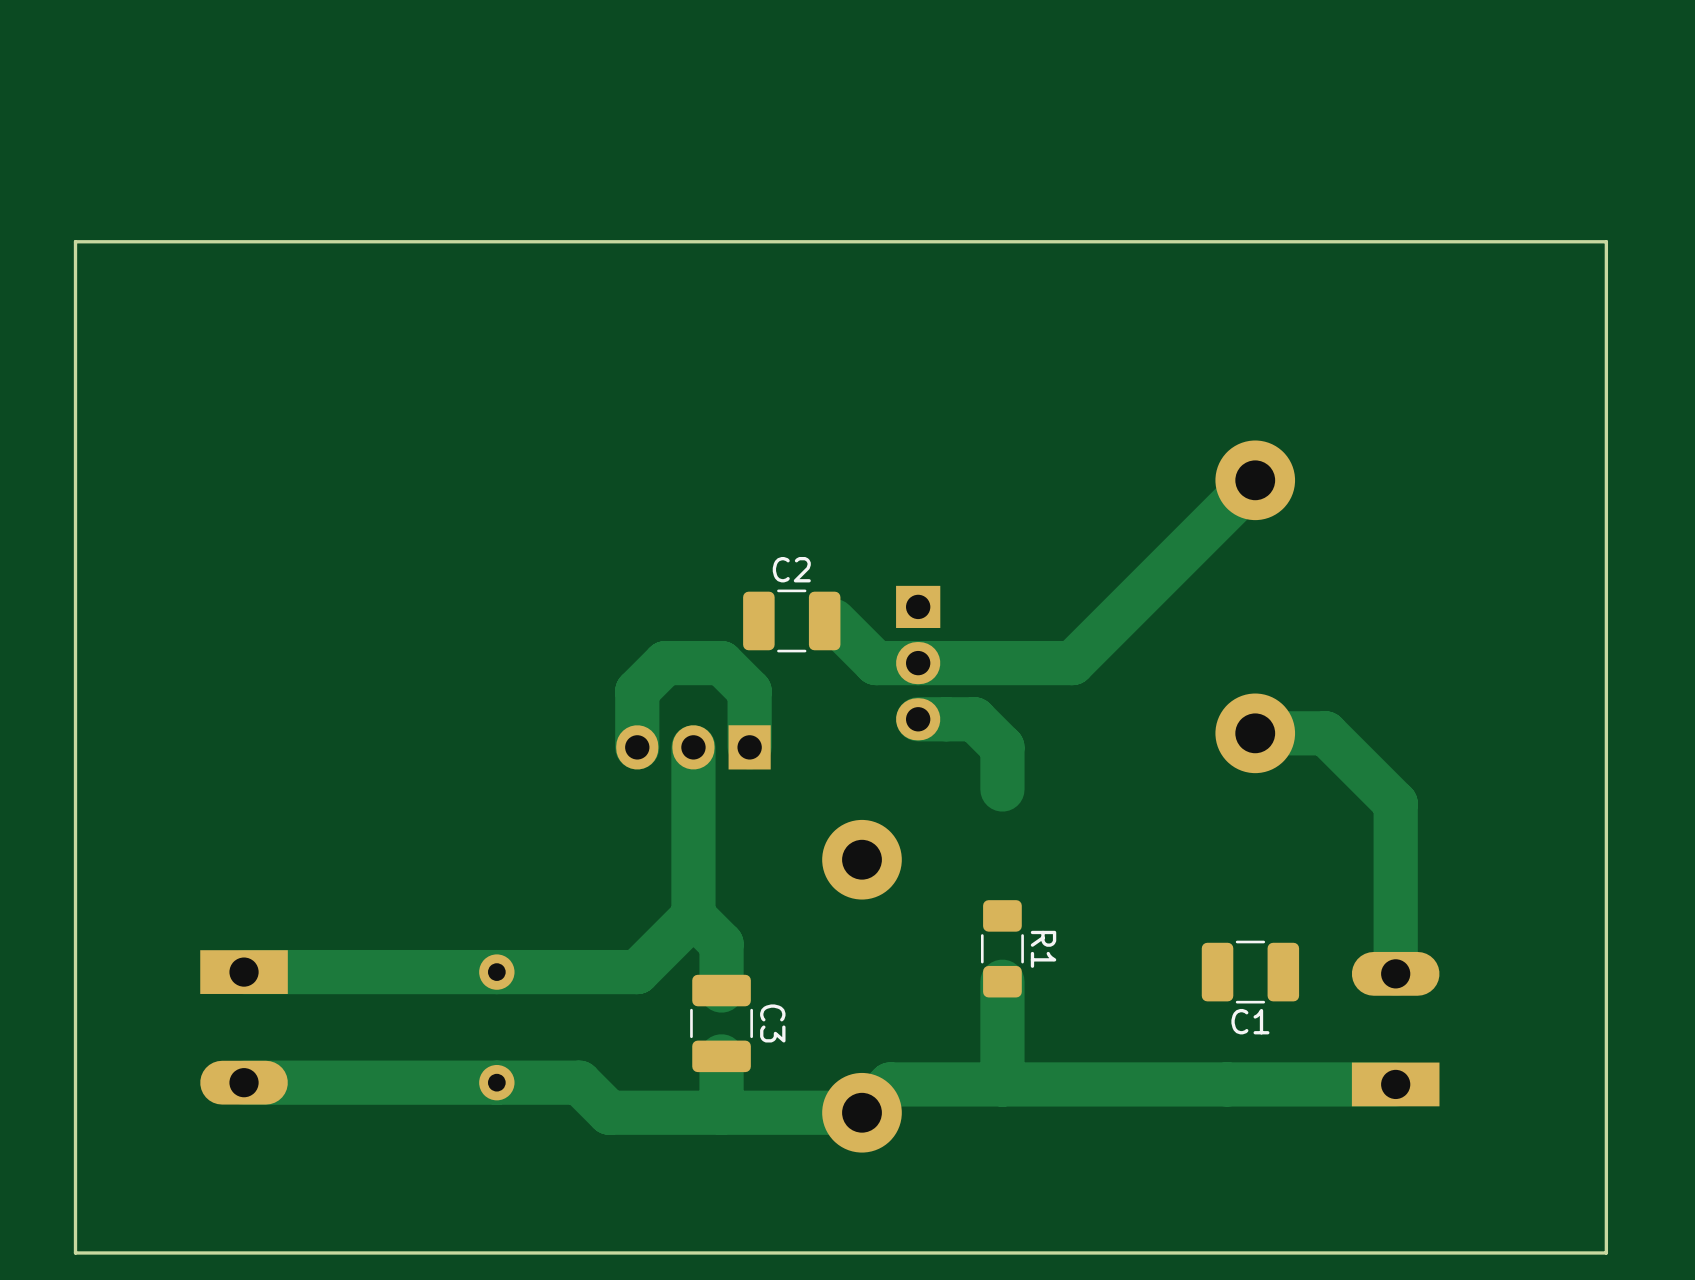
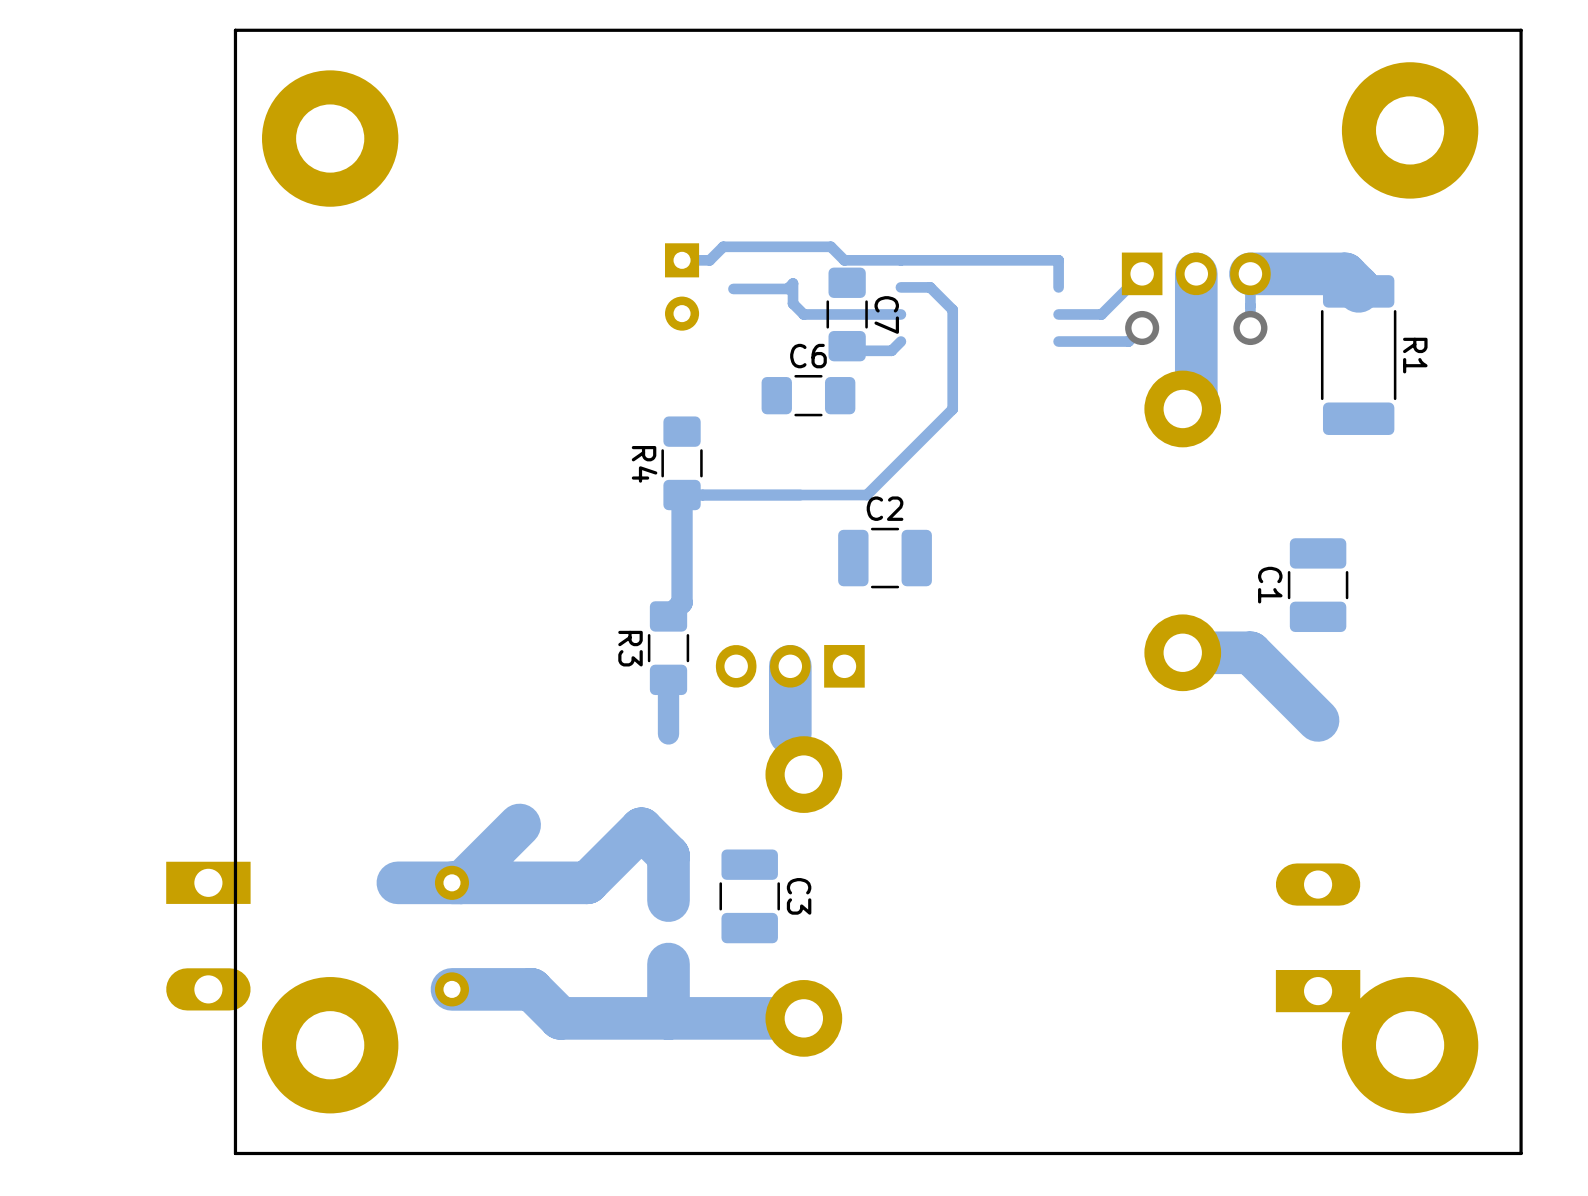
part: none -> (1410, 130)
part: none -> (330, 138)
board edge: (1606, 241) (75, 241) (75, 1252) (272, 1252) -> (1521, 179) (1521, 30) (235, 30) (235, 1153)
track: none -> (682, 260) (709, 260) (723, 246) (830, 246) (844, 260) (1058, 260) (1058, 287)
track: none -> (1142, 273) (1101, 314) (1058, 314)
part: none -> (1196, 273)
part: none -> (682, 286)
track: none -> (900, 287) (930, 287) (952, 309) (952, 409) (866, 495) (682, 495) (682, 602) (668, 616)
track: none -> (733, 288) (787, 288) (793, 283) (793, 303) (803, 314) (900, 314)
track: none -> (1358, 291) (1358, 287) (1345, 273) (1250, 273) (1250, 328)
C7: none -> (847, 314)
track: none -> (1142, 328) (1128, 341) (1058, 341)
via: none -> (1142, 328)
via: none -> (1250, 328)
track: none -> (900, 341) (891, 350) (844, 350)
C6: none -> (808, 395)
track: (1255, 480) (1072, 663) (876, 663) (833, 620) -> (1182, 408) (1196, 395) (1196, 273)
R4: none -> (682, 463)
C2 position: (791, 620) -> (885, 558)
part: (918, 663) -> none
track: (918, 719) (974, 719) (1002, 747) (1002, 789) -> none
R3: none -> (668, 648)
track: (693, 747) (693, 915) -> none
part: (693, 747) -> none
track: (749, 747) (749, 691) (721, 663) (665, 663) (637, 691) (637, 747) -> none
track: none -> (790, 666) (790, 733)
part: none -> (790, 666)
track: none -> (668, 679) (668, 733)
track: (1395, 803) (1395, 973) -> none
R1 footprint: [980, 900, 1024, 998] -> [1320, 275, 1397, 435]
track: none -> (519, 824) (461, 882)
track: (440, 972) (244, 972) -> none
C1 rotation: 0° (1250, 972) -> 90° clockwise (1318, 585)
C1 position: (1250, 972) -> (1318, 585)
track: (1002, 981) (1002, 1084) -> none
C3 position: (721, 1023) -> (749, 896)
track: (496, 1082) (244, 1082) -> none
track: (1395, 1084) (890, 1084) (861, 1112) -> none
part: none -> (330, 1045)
part: none -> (1410, 1045)

